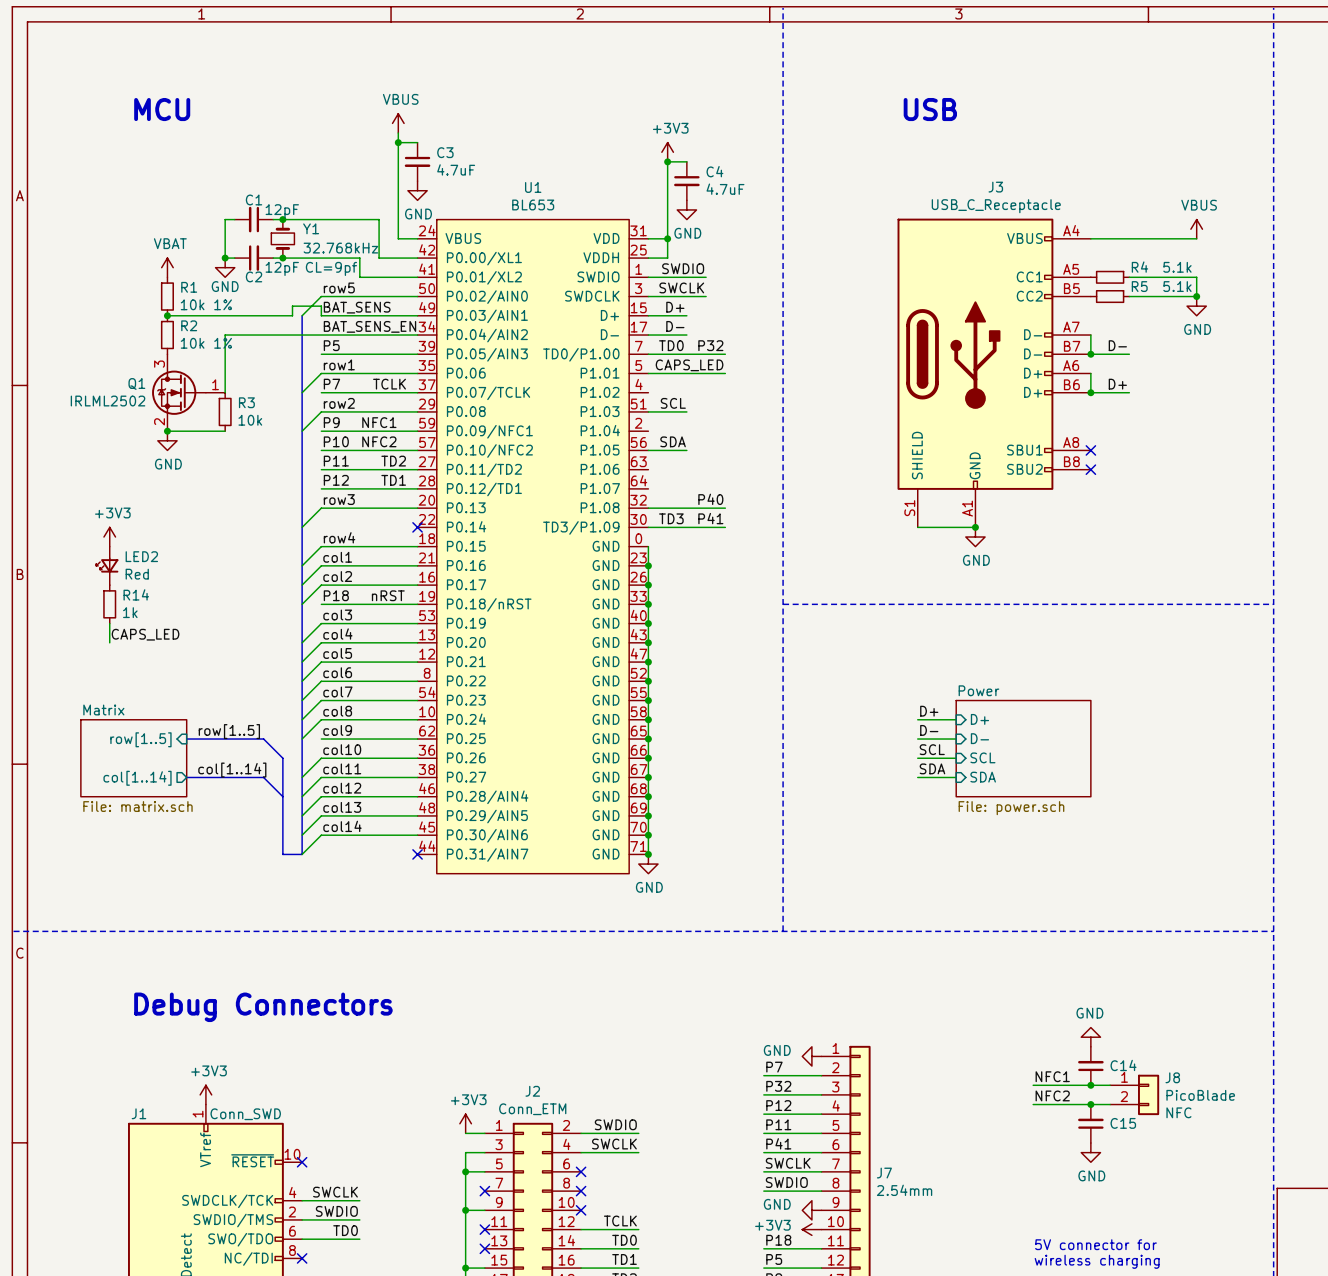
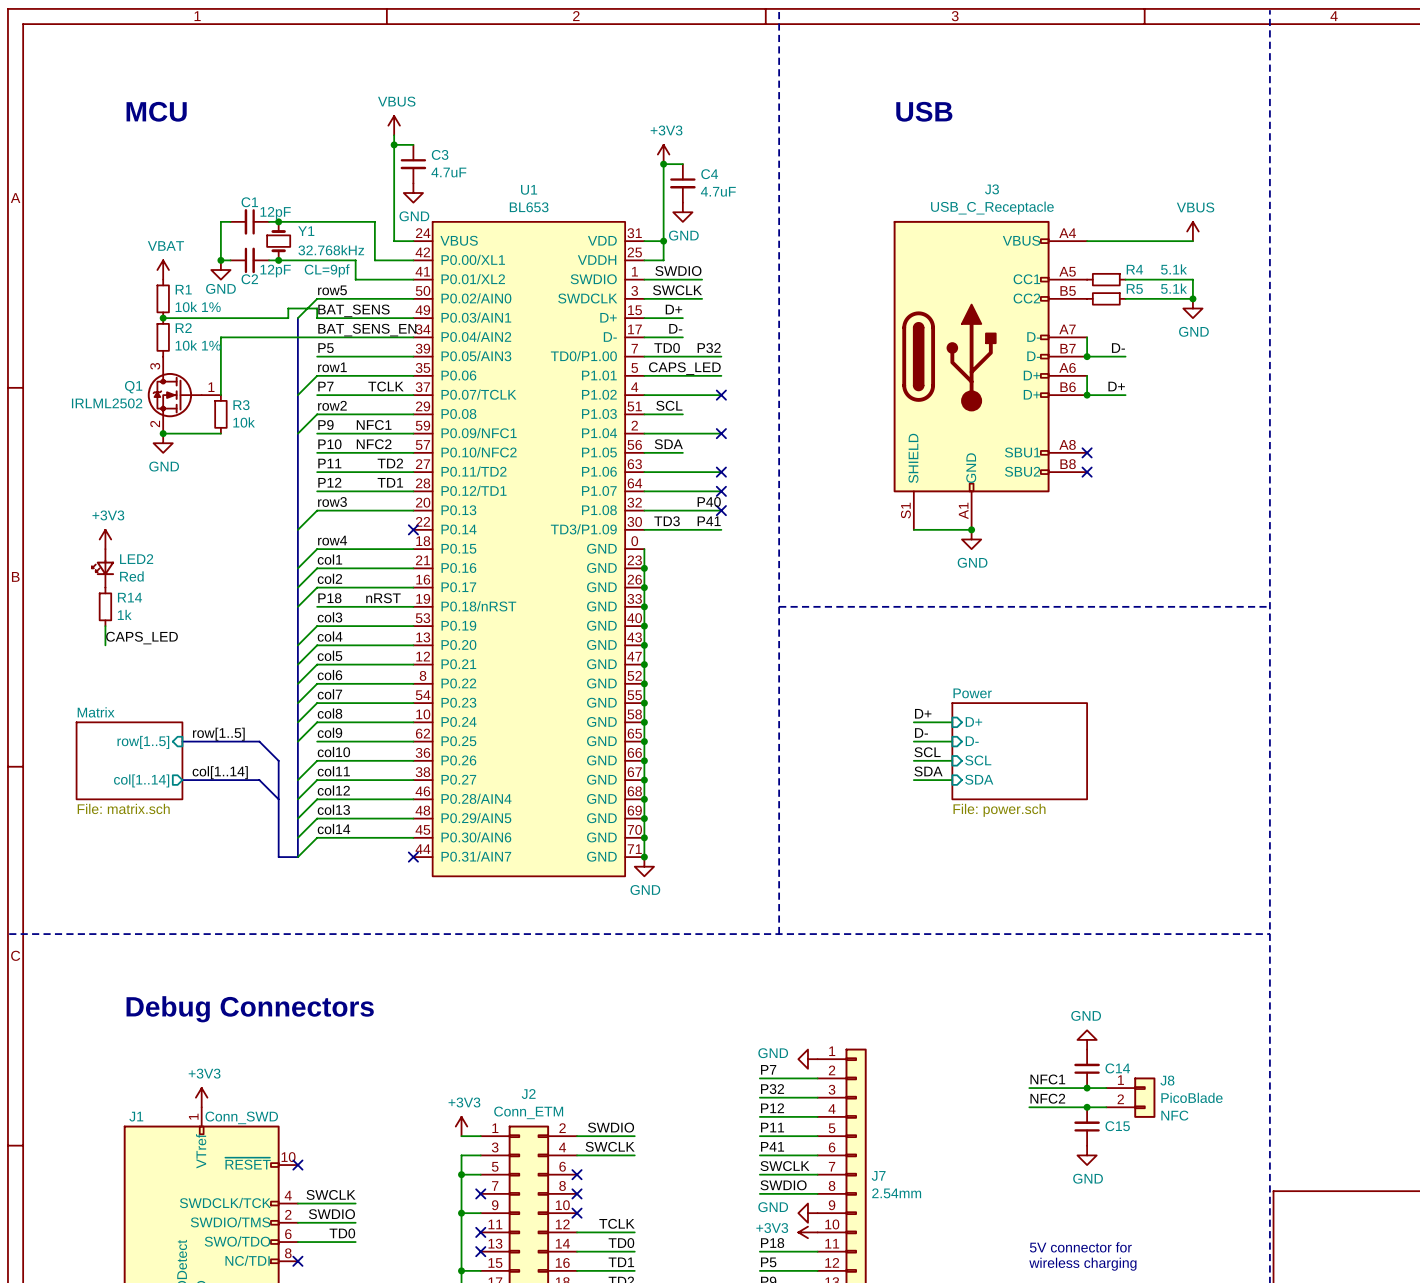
wire: none -> (644, 395) (721, 395)
no-connect mark: none -> (721, 395)
wire: none -> (644, 433) (721, 433)
no-connect mark: none -> (721, 433)
wire: none -> (644, 472) (721, 472)
no-connect mark: none -> (721, 472)
wire: none -> (644, 491) (721, 491)
no-connect mark: none -> (721, 491)
no-connect mark: none -> (721, 510)

